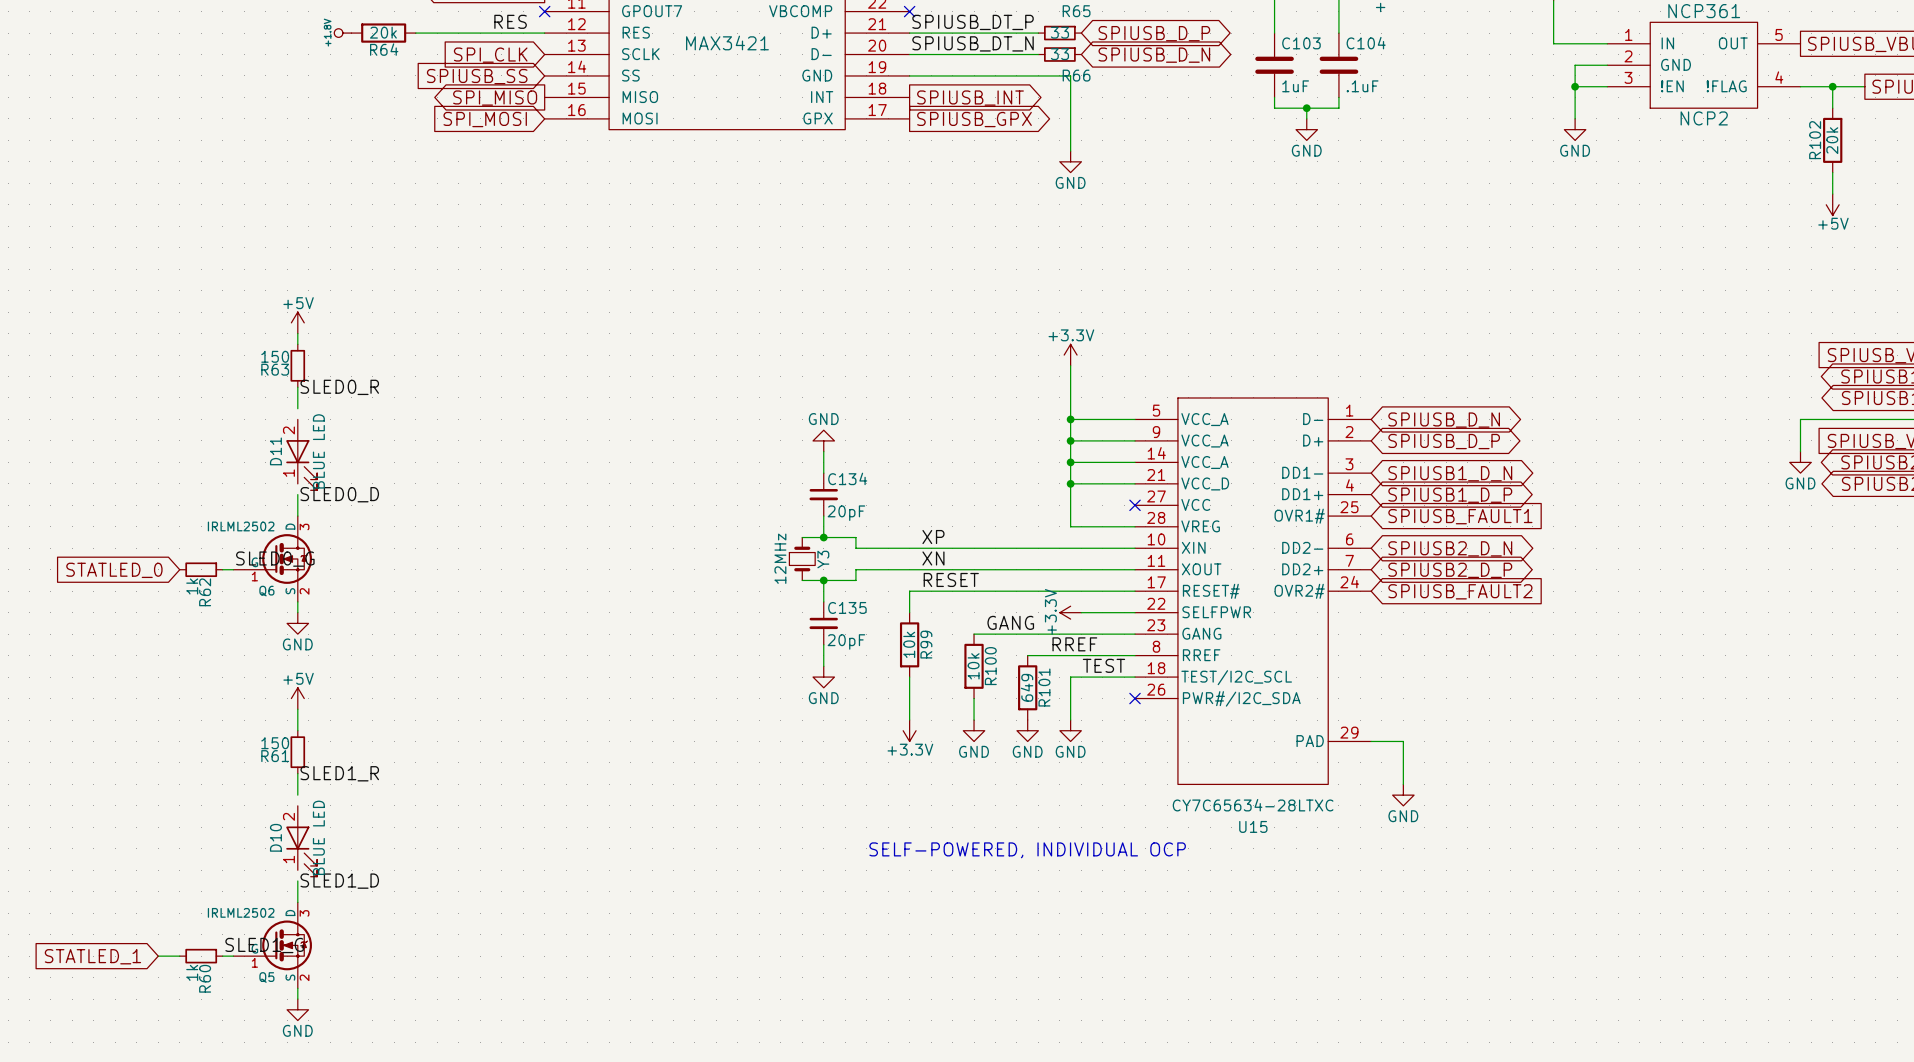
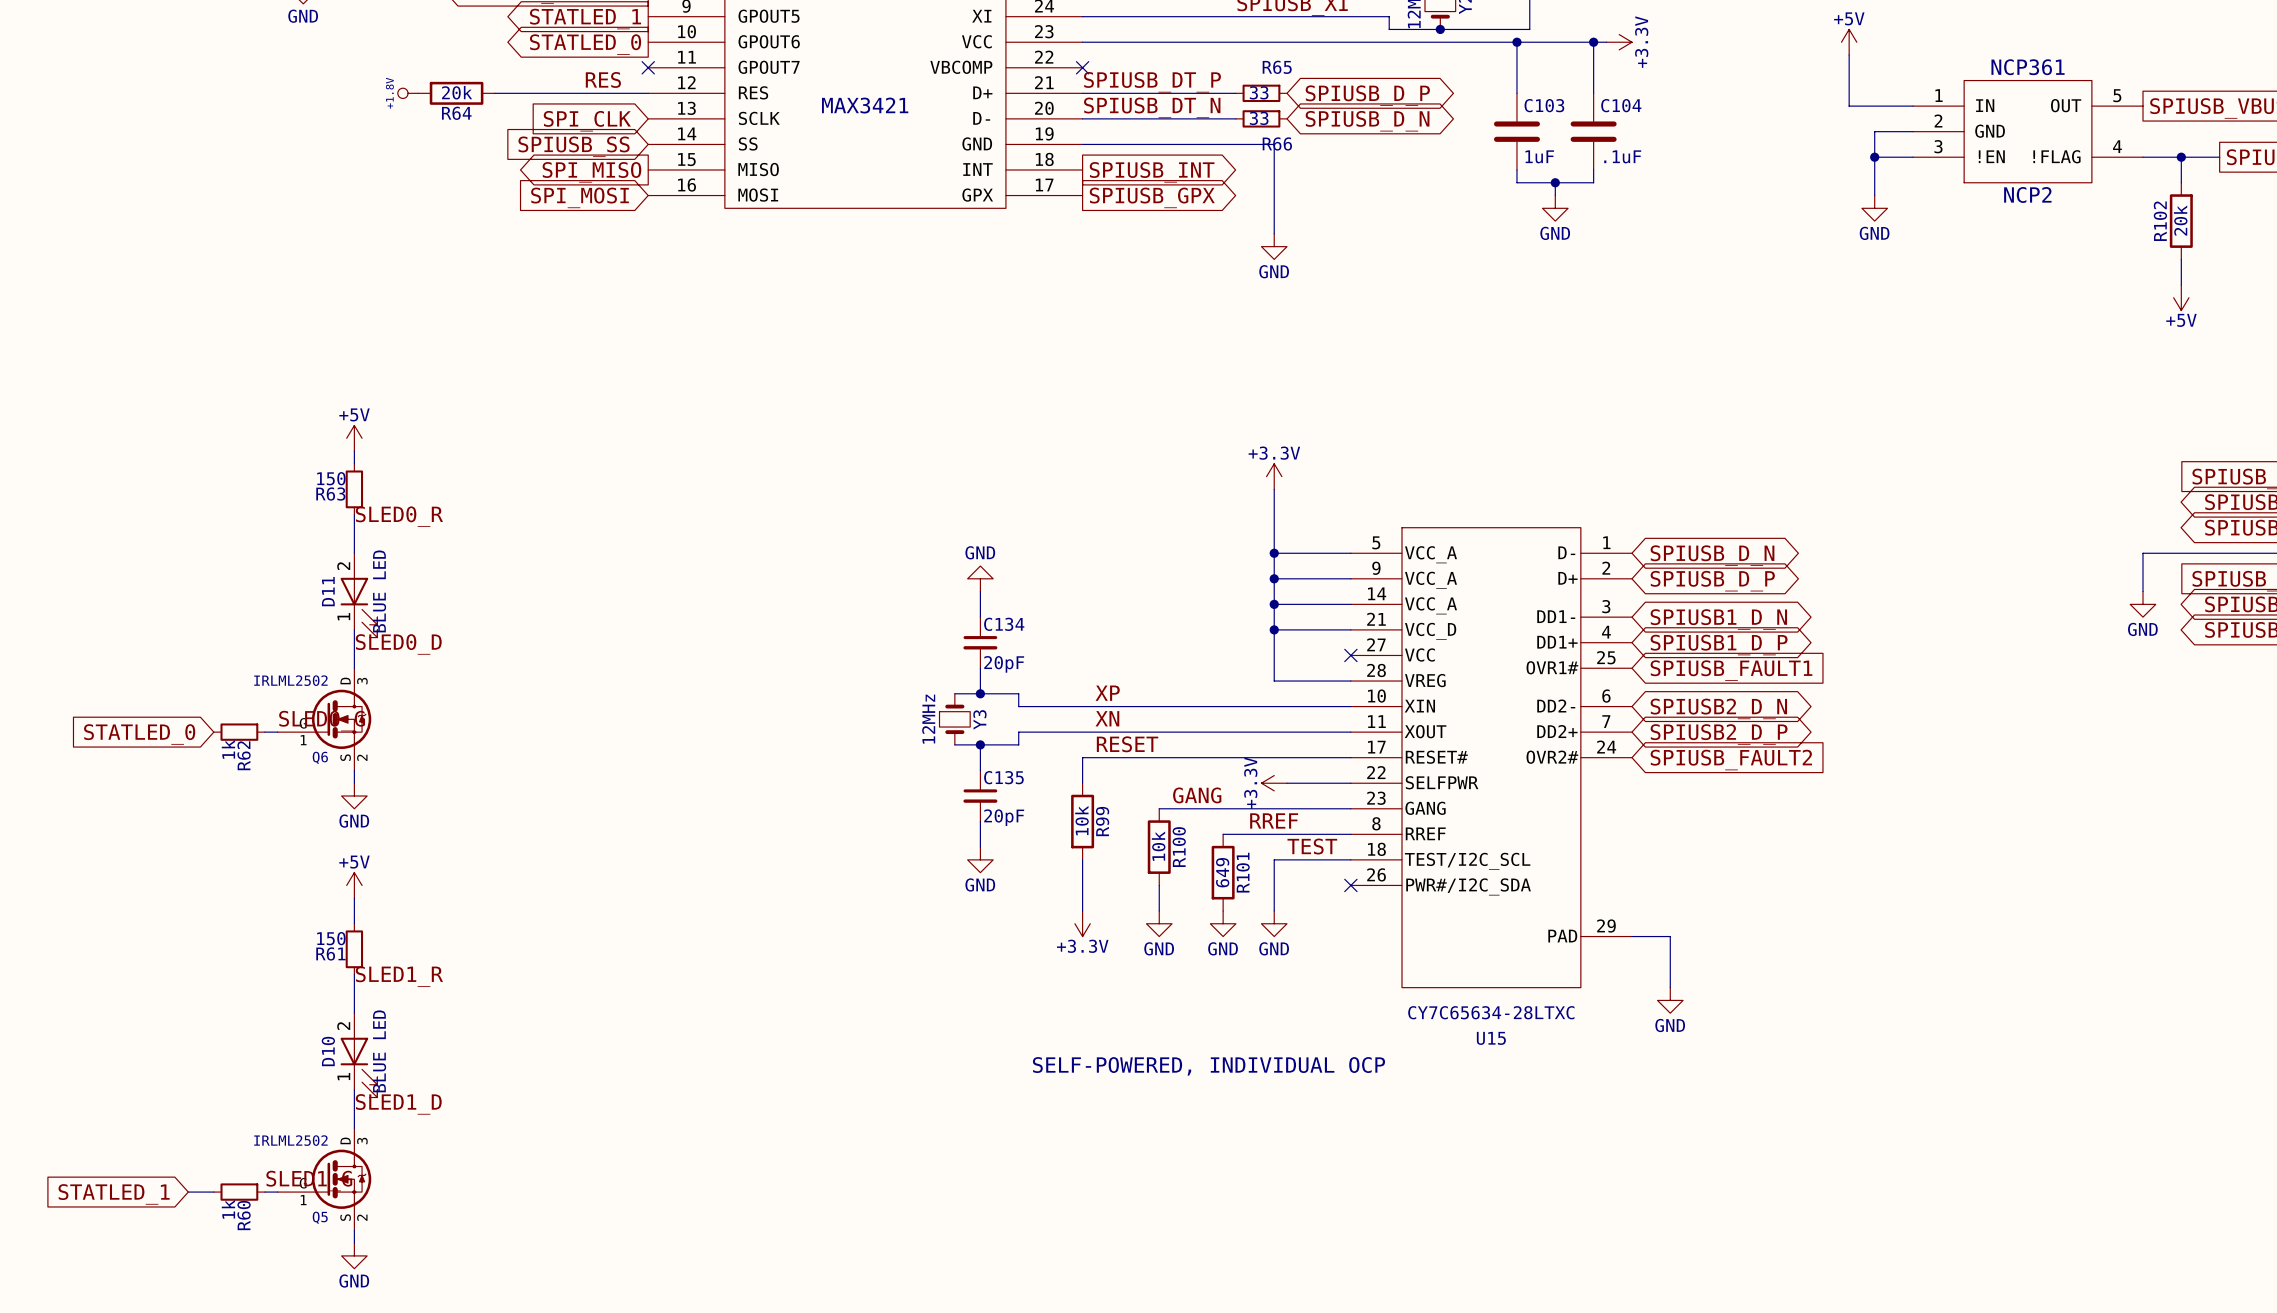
wire: none -> (354, 540) (354, 553)
wire: none -> (354, 629) (354, 642)
wire: none -> (354, 1000) (354, 1013)
wire: none -> (354, 1089) (354, 1102)

